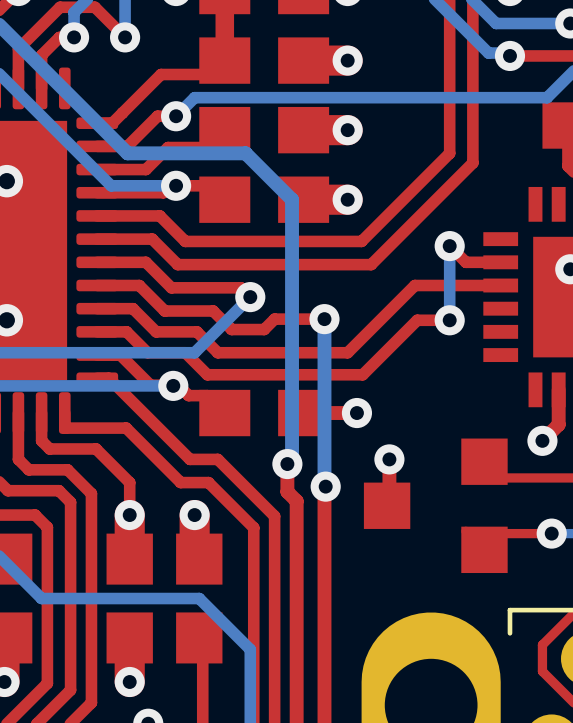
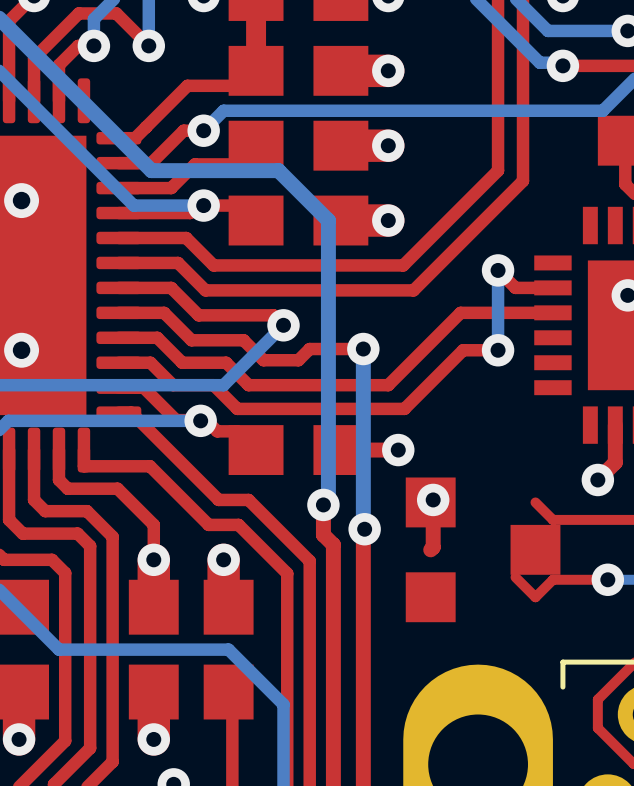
part rotation: 0° (435, 505) -> 180° (483, 549)

